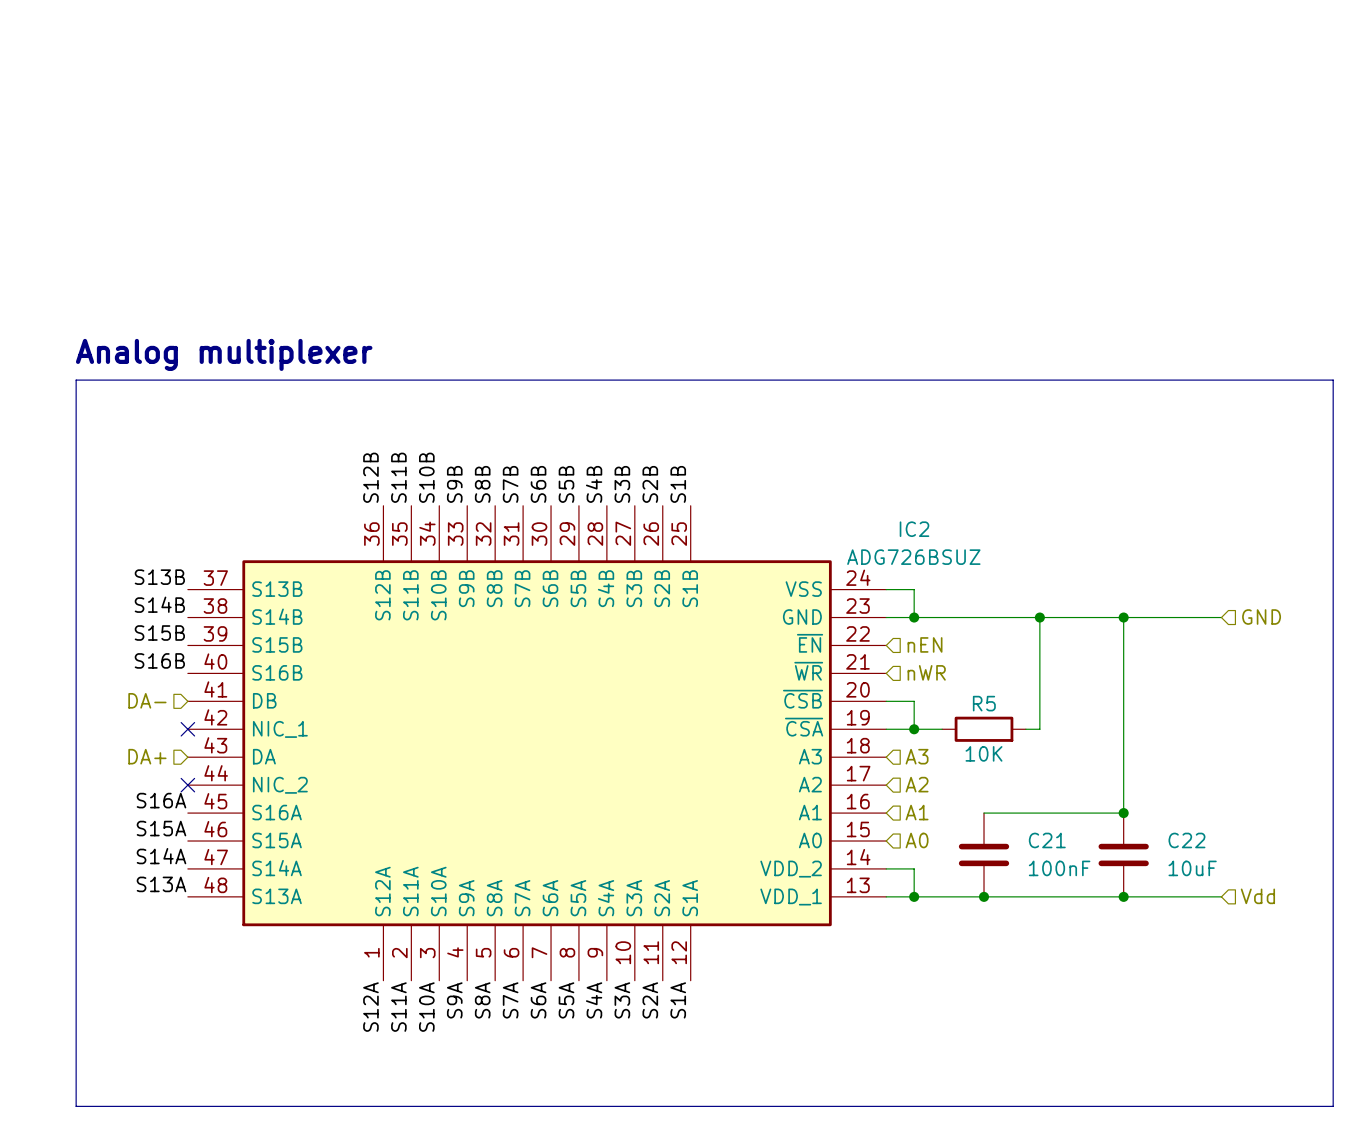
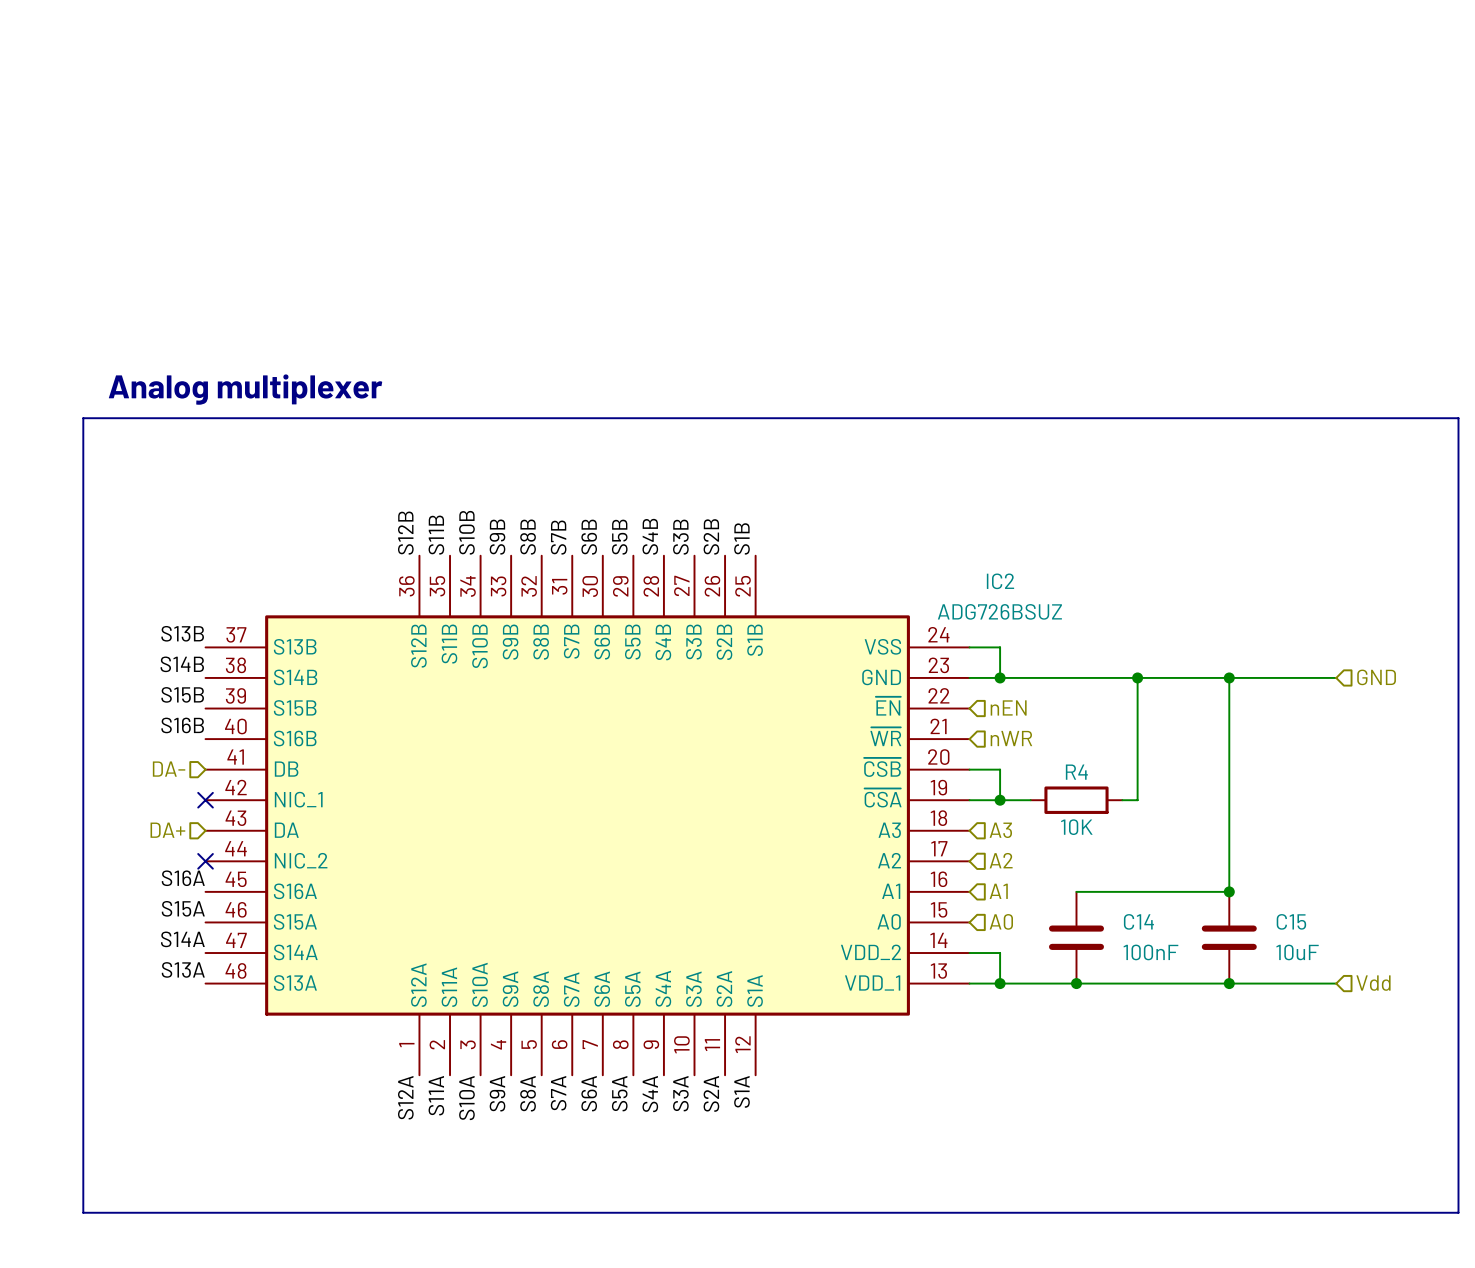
R5 name: R5 (984, 703) -> R4 (1076, 772)
C21 name: C21 (1047, 840) -> C14 (1138, 921)
C22 name: C22 (1186, 840) -> C15 (1291, 921)

